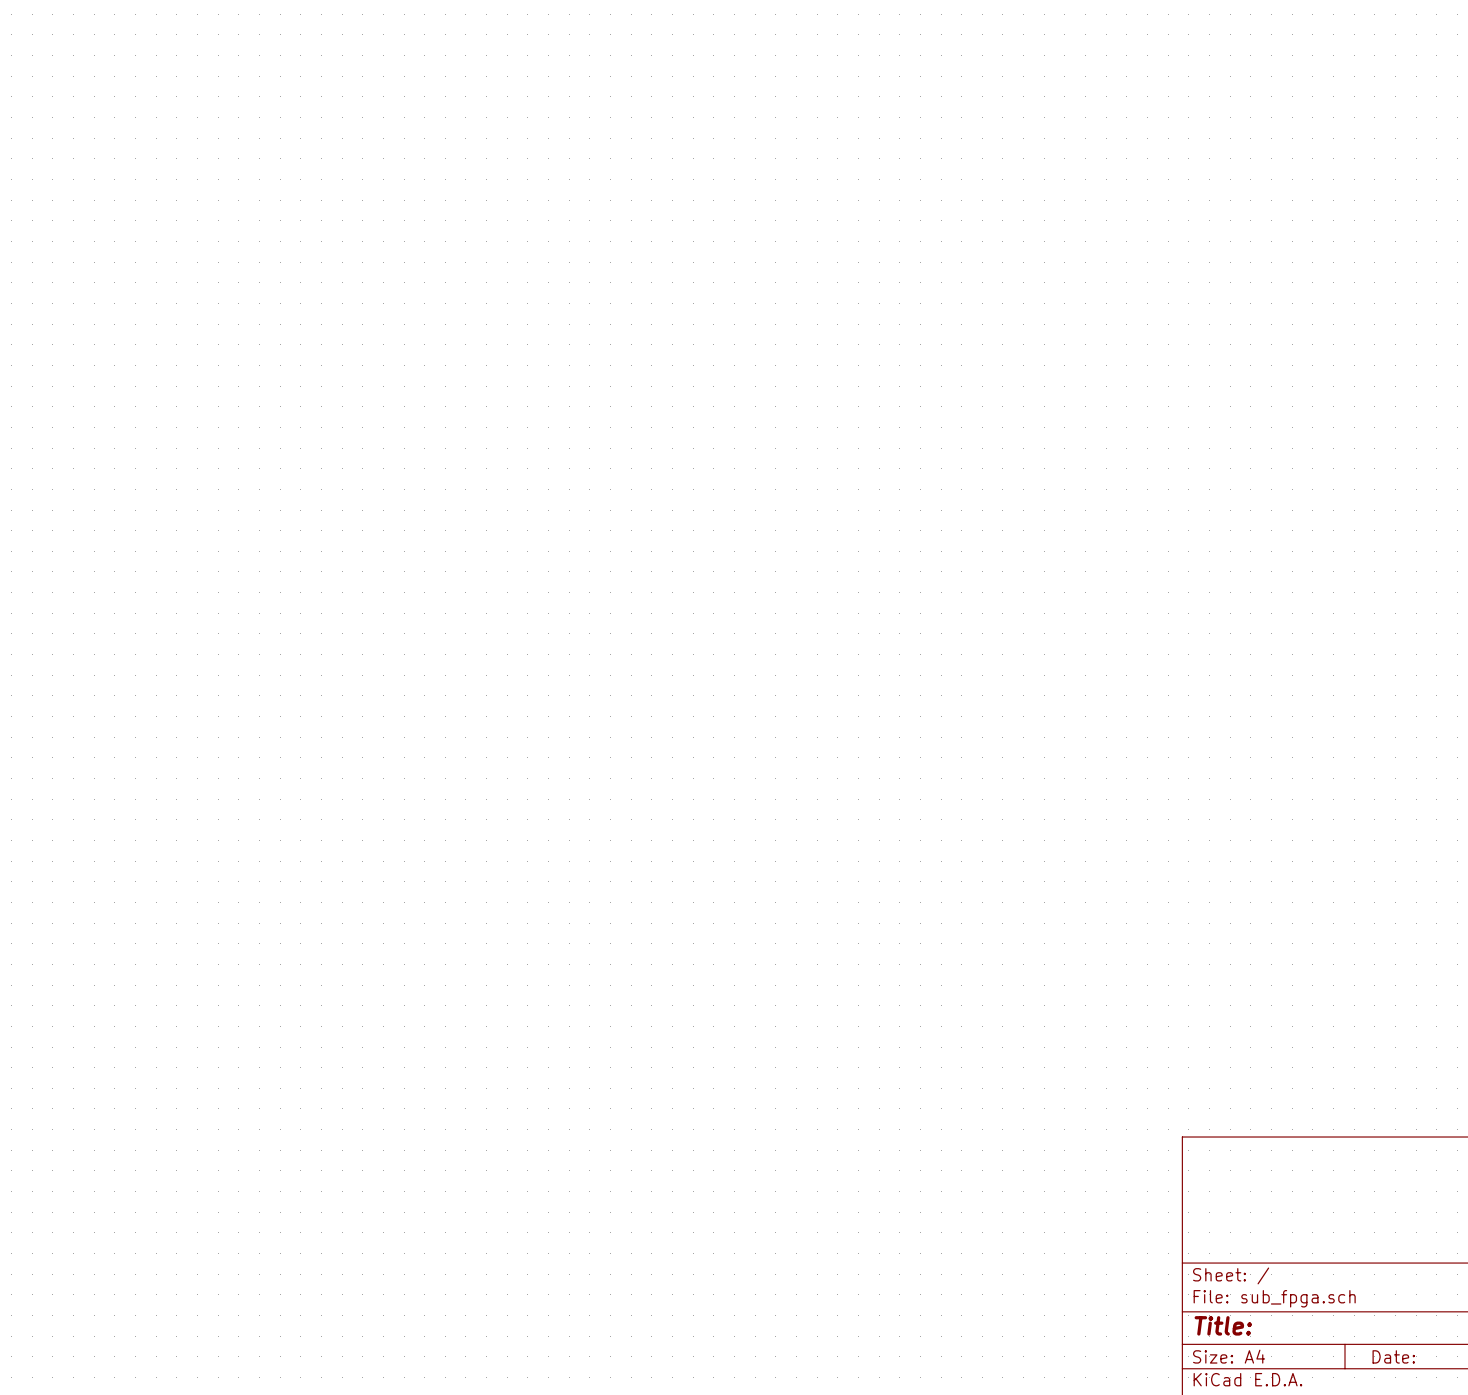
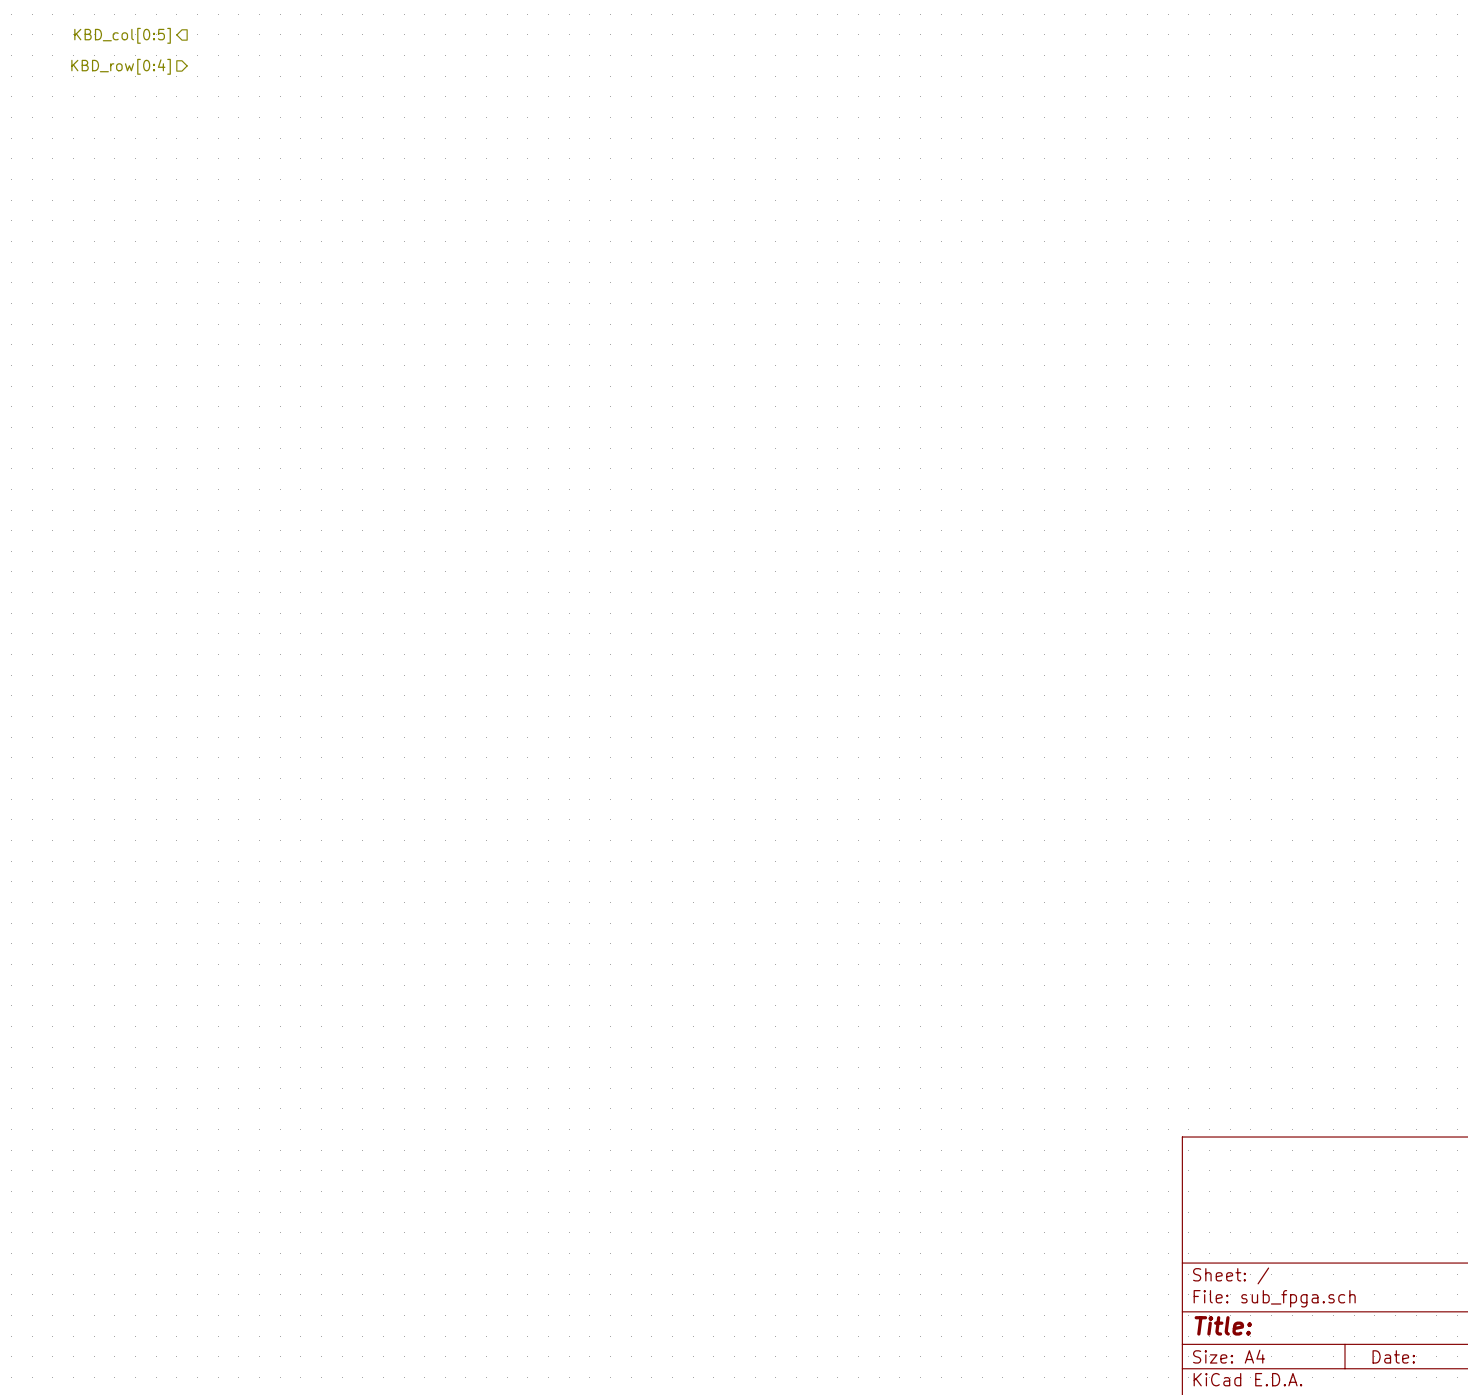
hierarchical label: none -> KBD_col[0:5] (122, 35)
hierarchical label: none -> KBD_row[0:4] (121, 66)

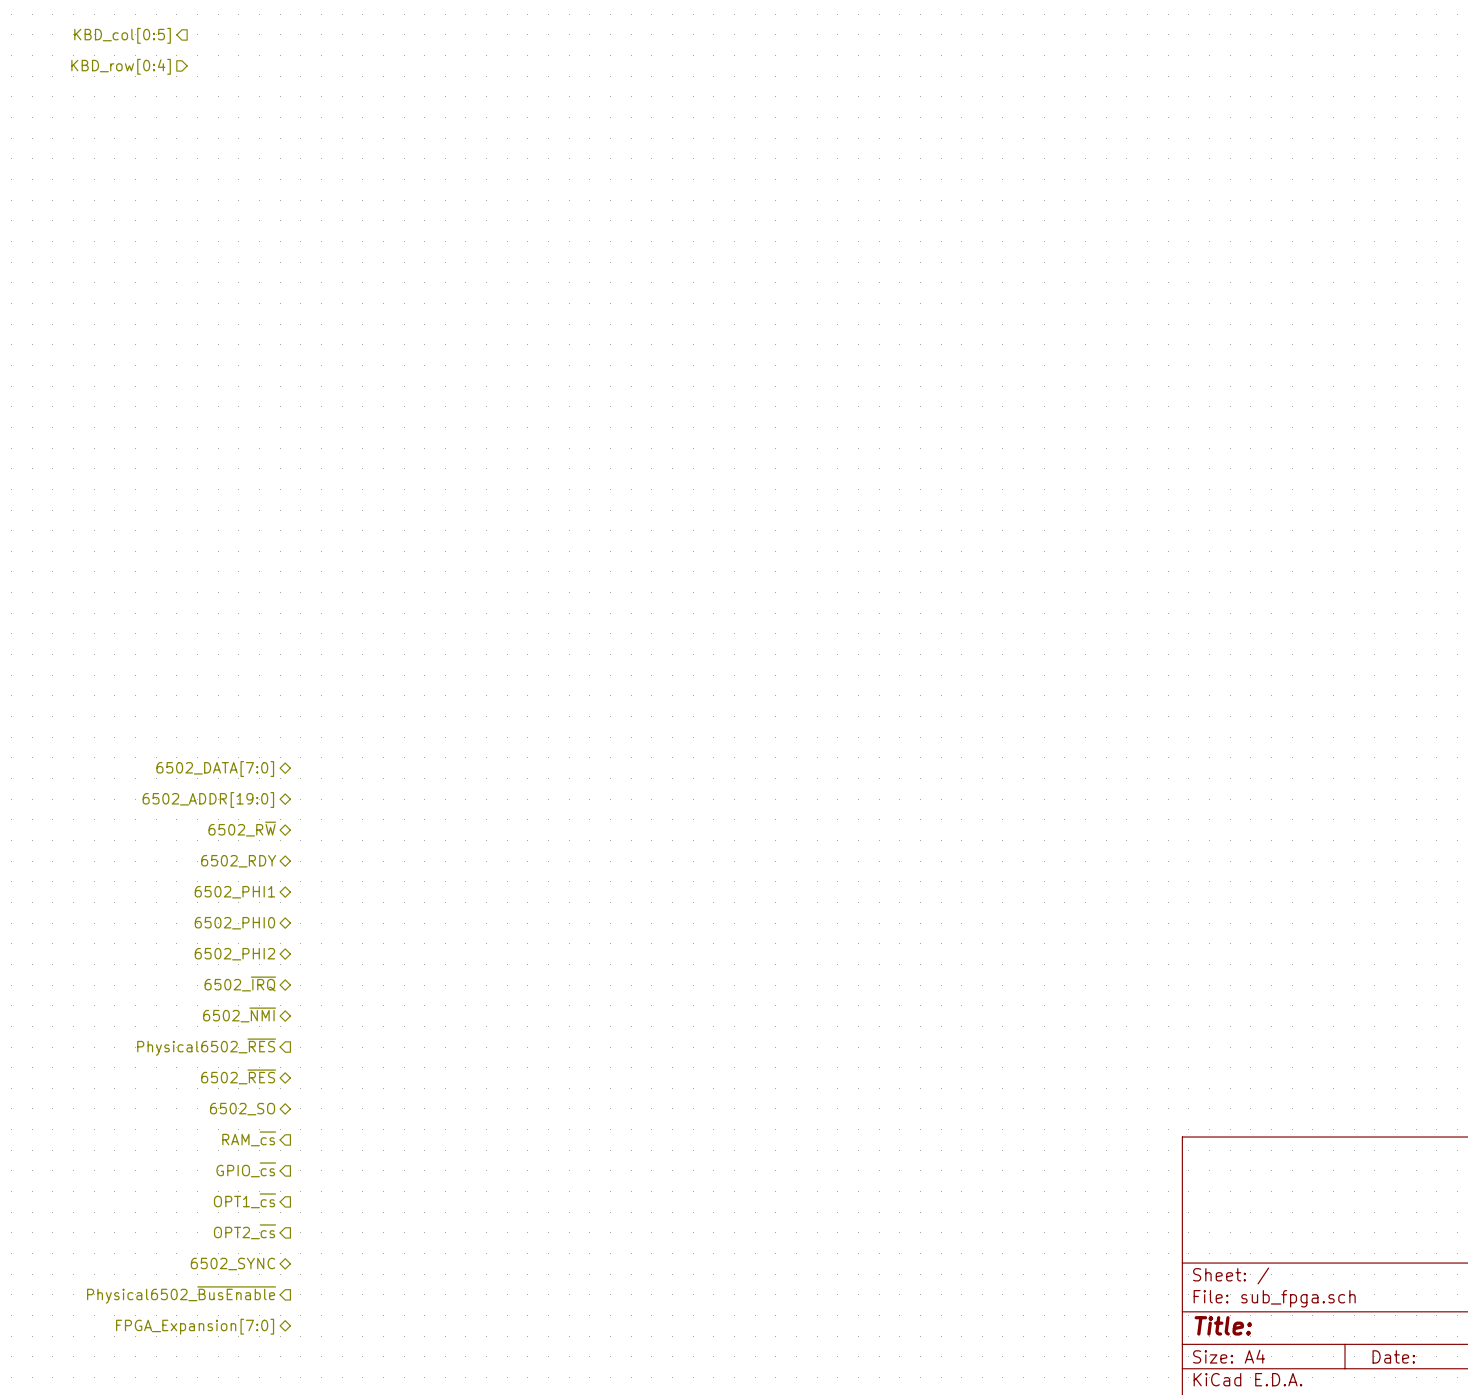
hierarchical label: none -> 6502_DATA[7:0] (215, 769)
hierarchical label: none -> 6502_ADDR[19:0] (208, 800)
hierarchical label: none -> 6502_R~{W} (242, 829)
hierarchical label: none -> 6502_RDY (238, 861)
hierarchical label: none -> 6502_PHI1 (234, 892)
hierarchical label: none -> 6502_PHI0 (234, 923)
hierarchical label: none -> 6502_PHI2 (234, 954)
hierarchical label: none -> 6502_~{IRQ} (240, 983)
hierarchical label: none -> 6502_~{NMI} (239, 1014)
hierarchical label: none -> Physical6502_~{RES} (206, 1047)
hierarchical label: none -> 6502_~{RES} (238, 1076)
hierarchical label: none -> 6502_SO (242, 1109)
hierarchical label: none -> RAM_~{cs} (249, 1138)
hierarchical label: none -> GPIO_~{cs} (246, 1169)
hierarchical label: none -> OPT1_~{cs} (244, 1200)
hierarchical label: none -> OPT2_~{cs} (244, 1231)
hierarchical label: none -> 6502_SYNC (232, 1263)
hierarchical label: none -> Physical6502_~{BusEnable} (181, 1295)
hierarchical label: none -> FPGA_Expansion[7:0] (195, 1326)

